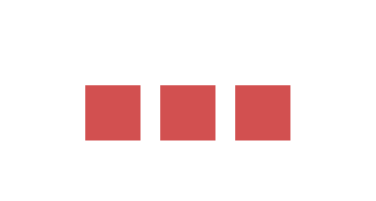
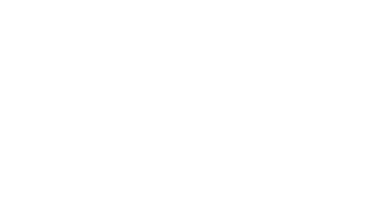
part: (187, 112) -> none

